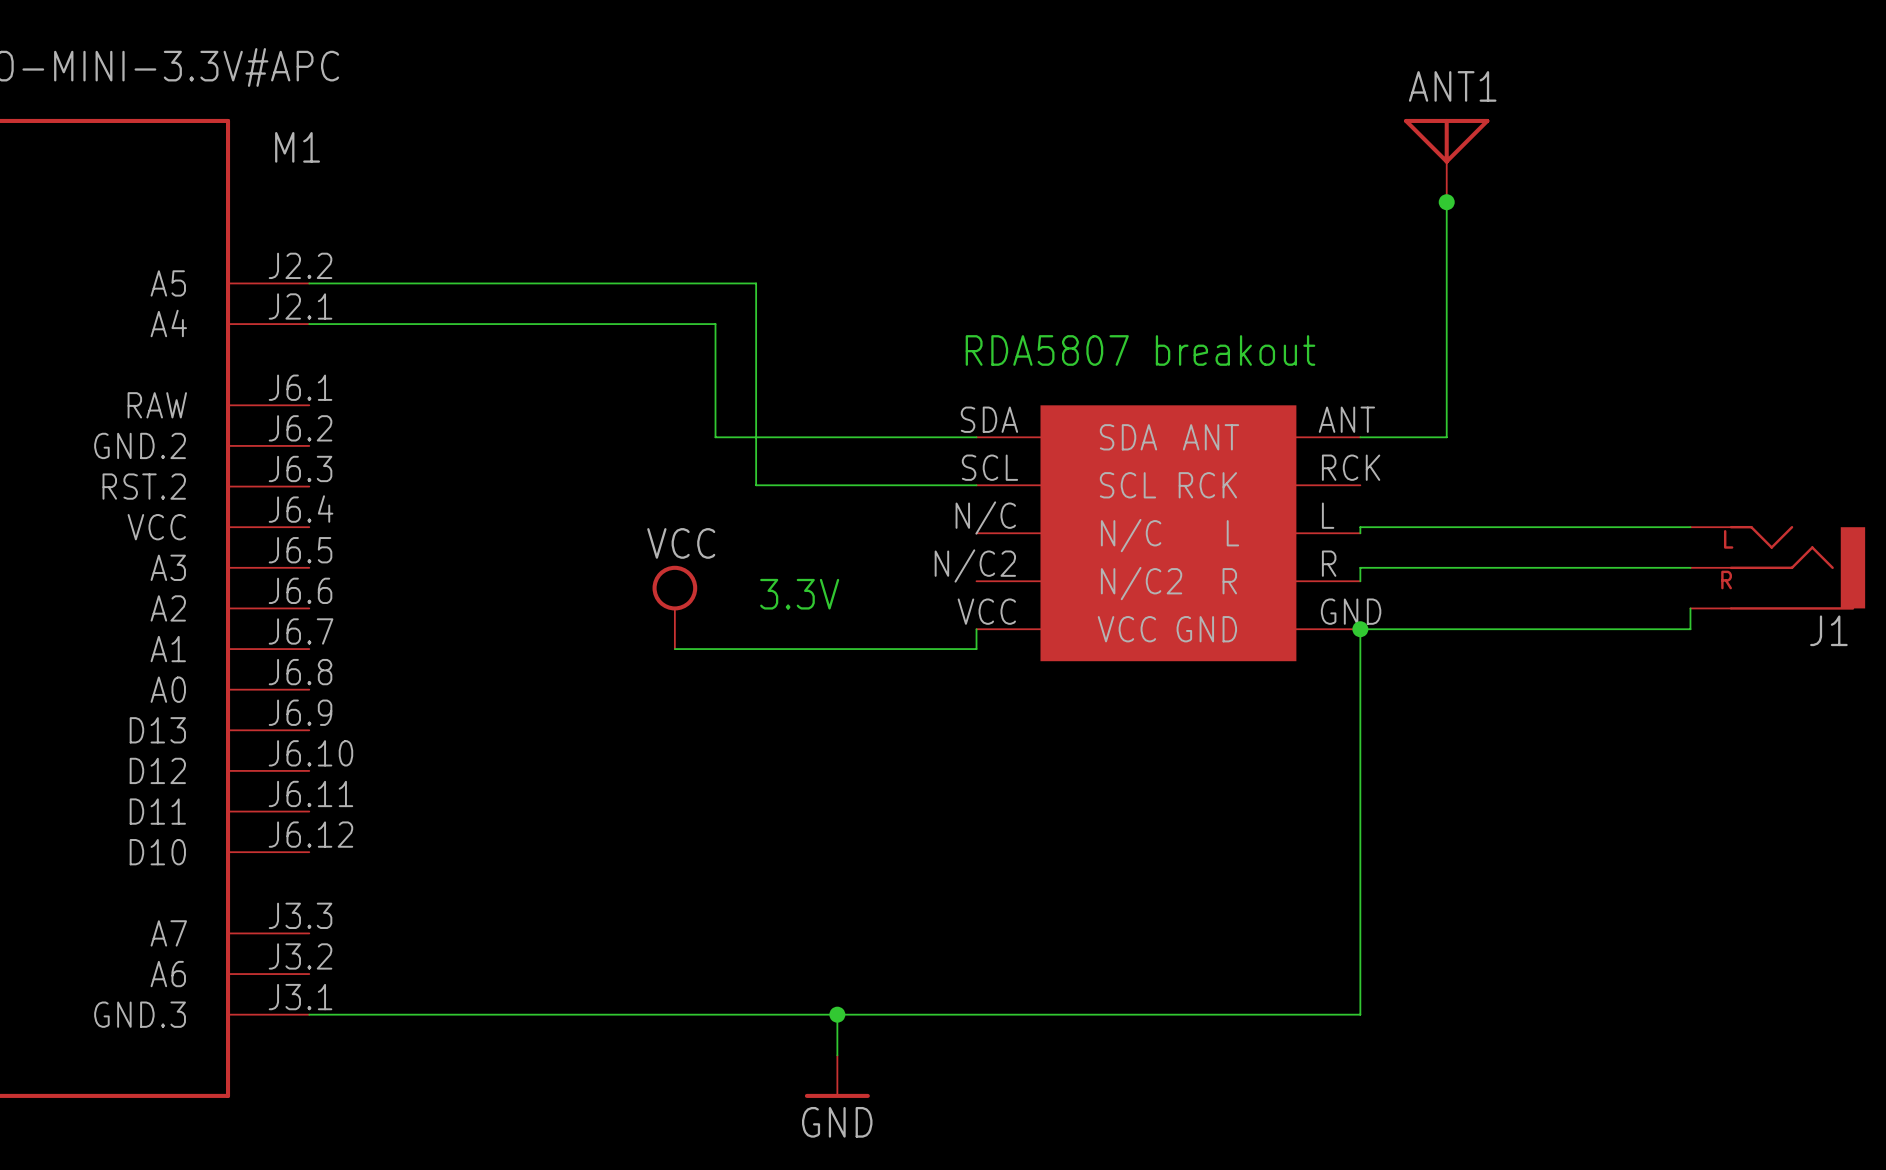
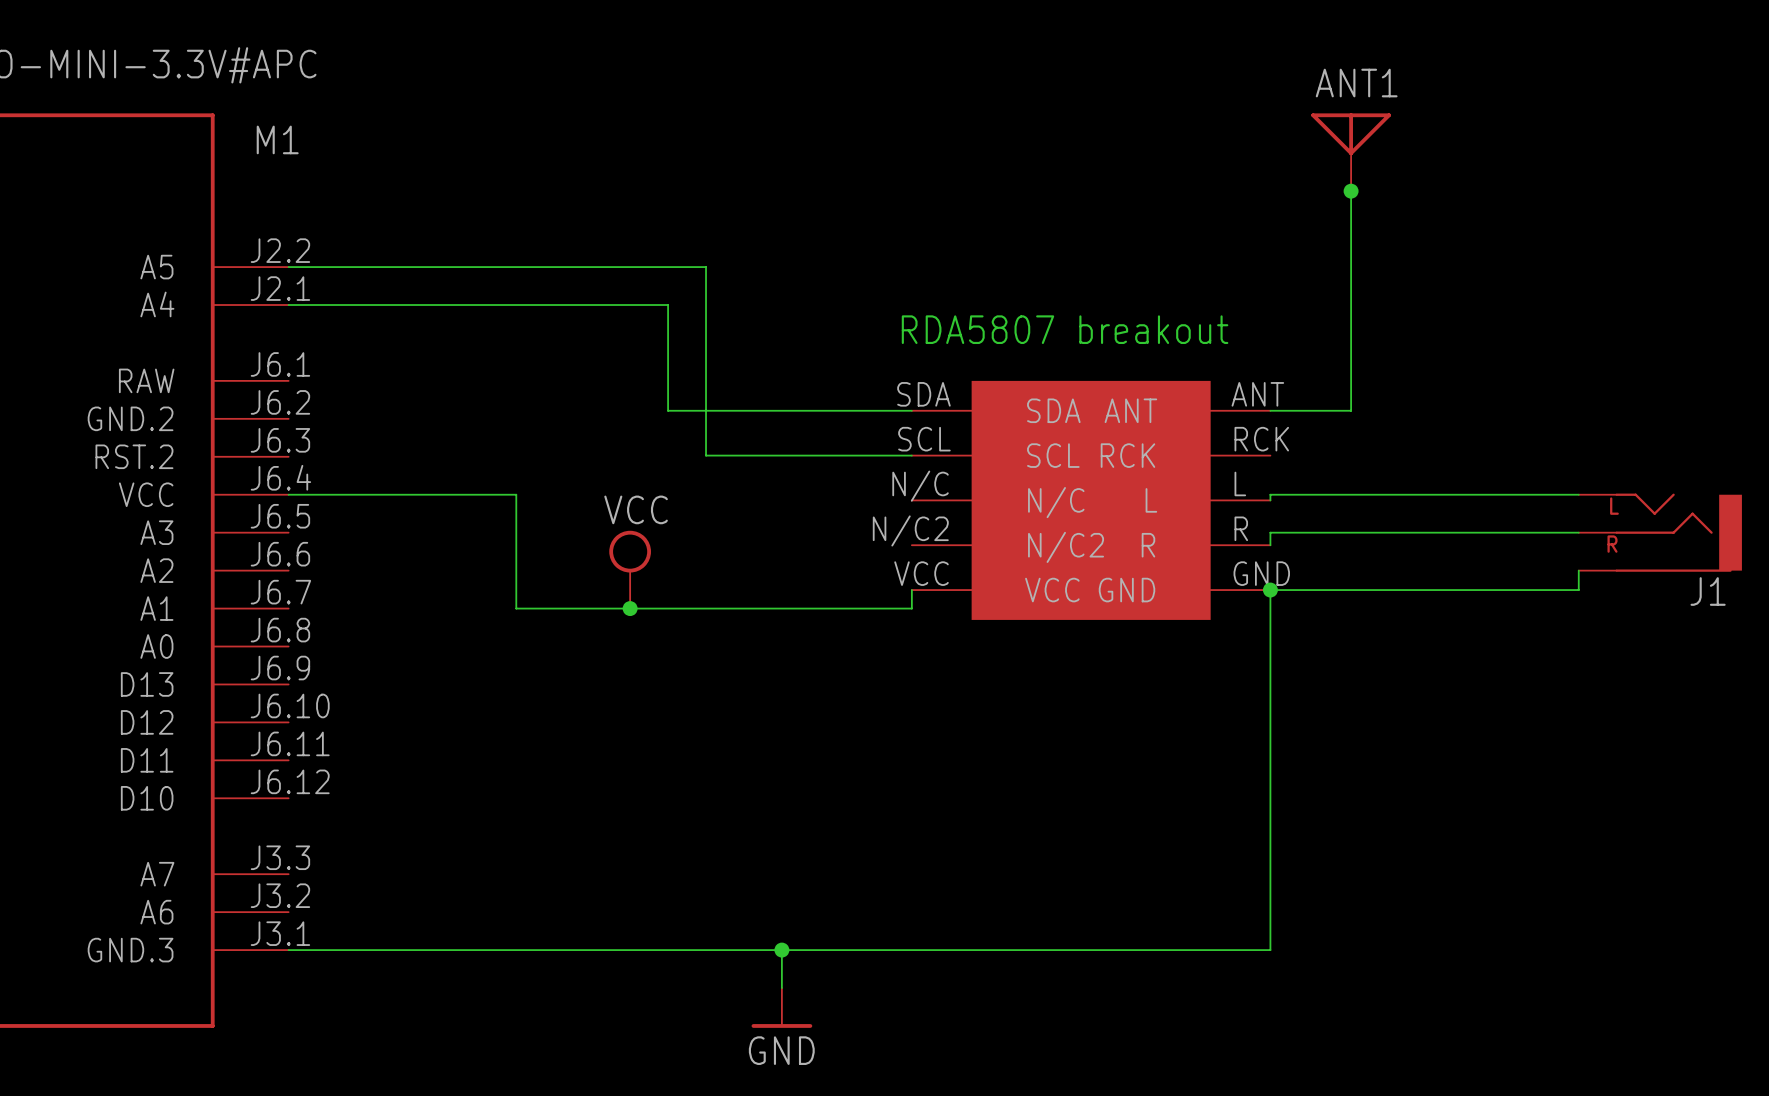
wire: none -> (288, 494) (516, 494) (516, 608) (630, 608)
text: 3.3V (799, 594) -> none
junction: none -> (630, 608)

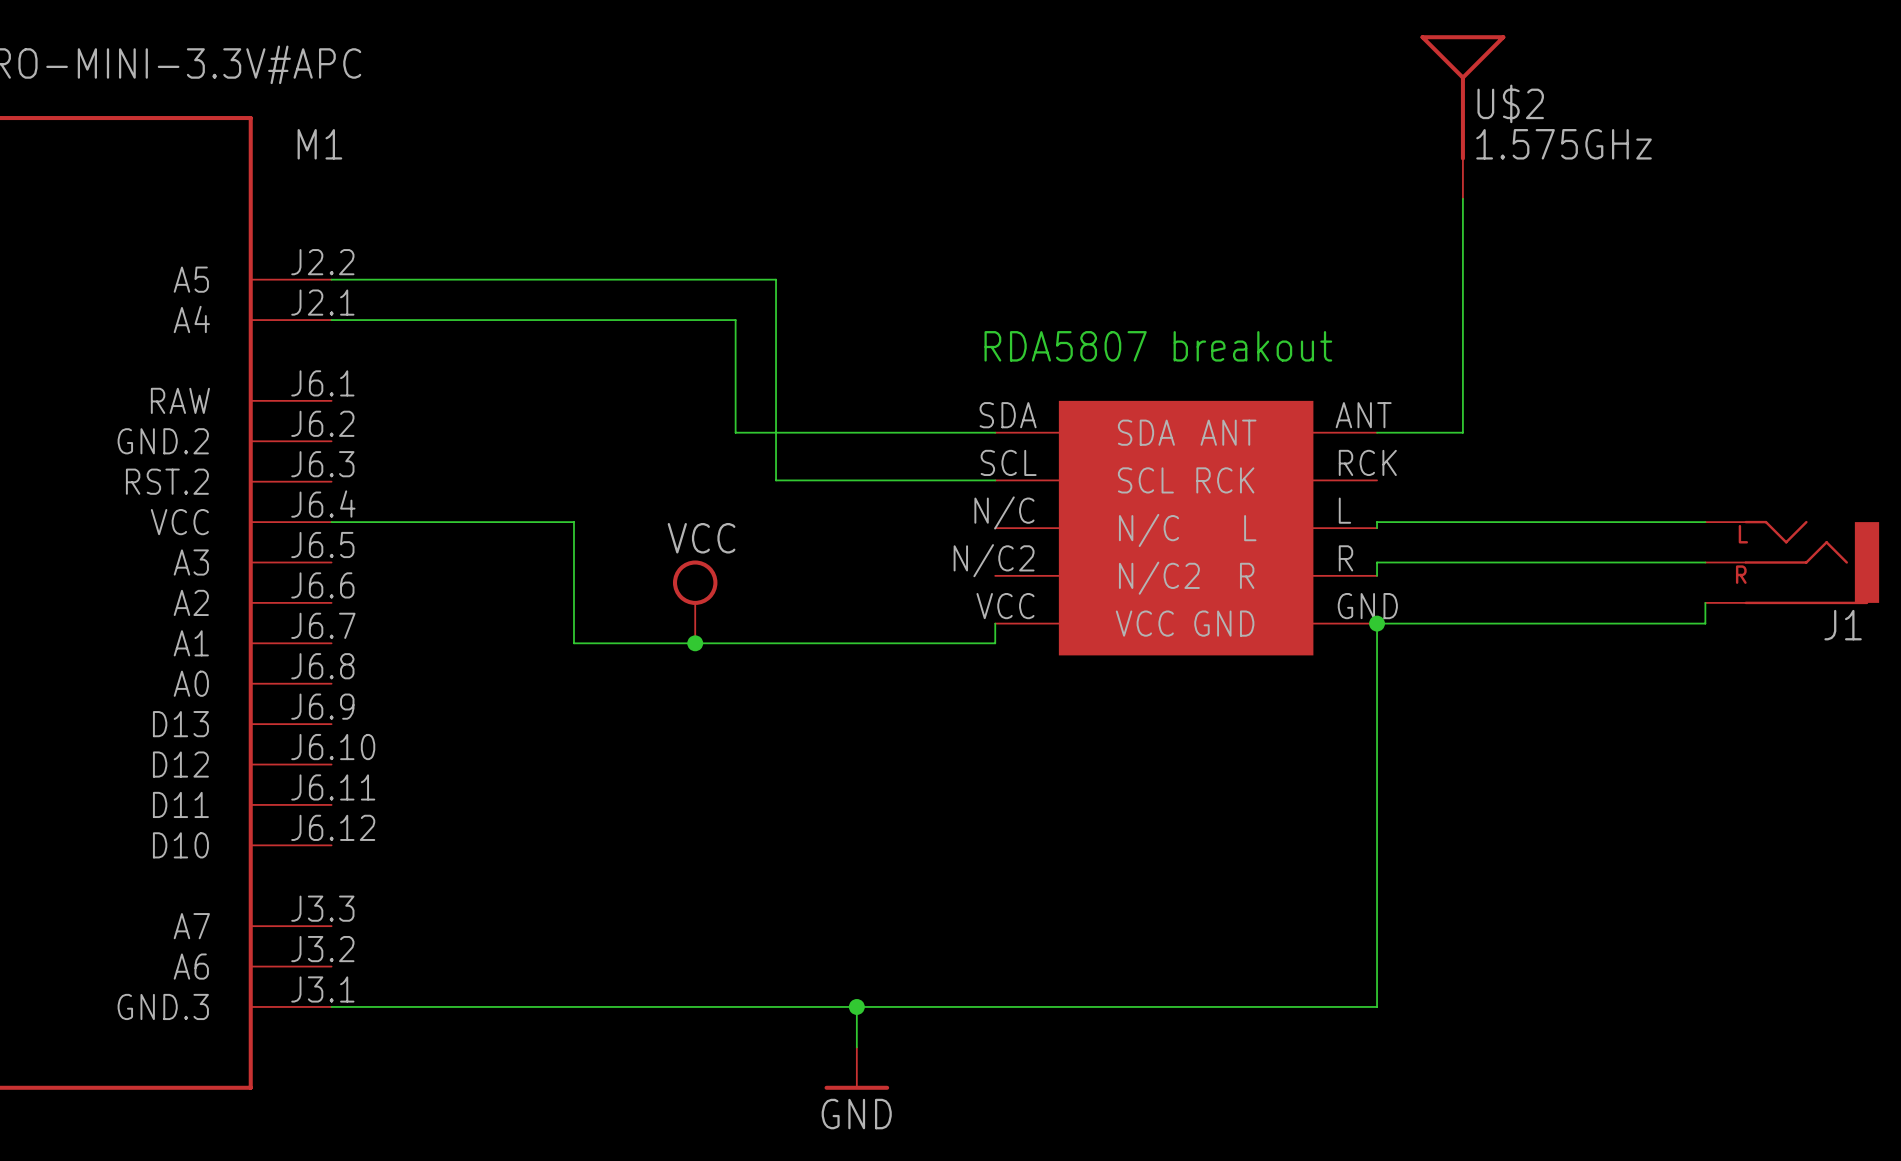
U$2: none -> 1.575GHz (1462, 117)
ANT1: (1351, 152) -> none
junction: (1351, 191) -> none

